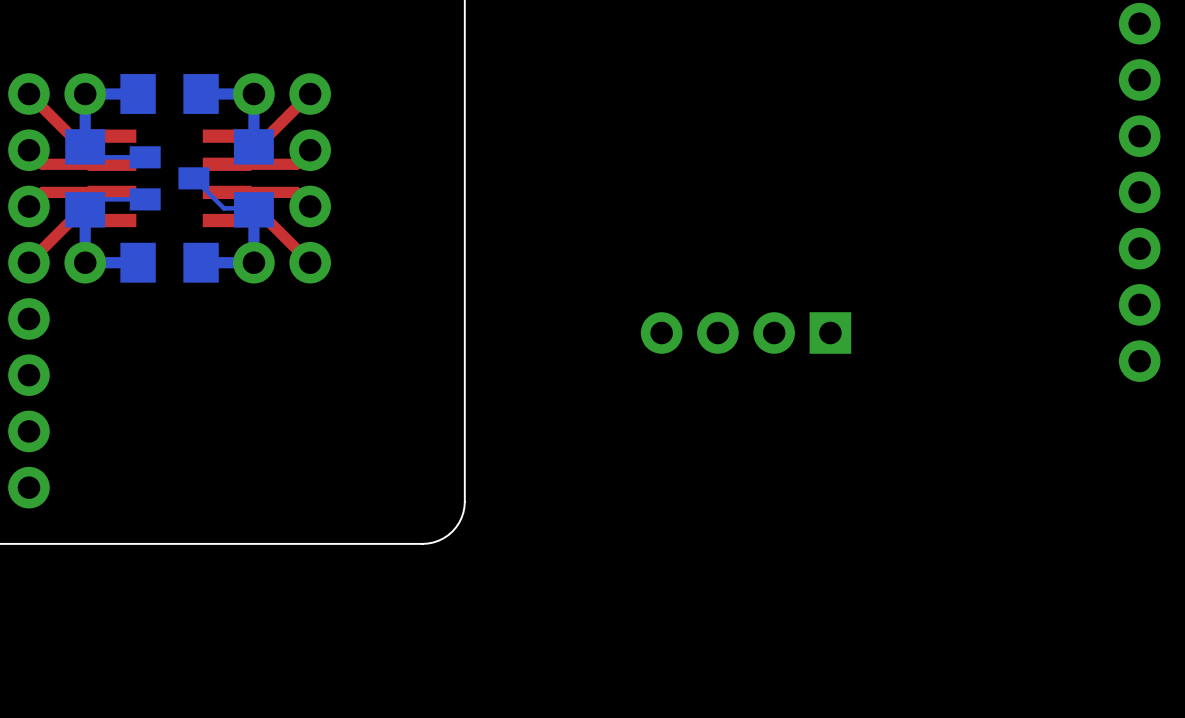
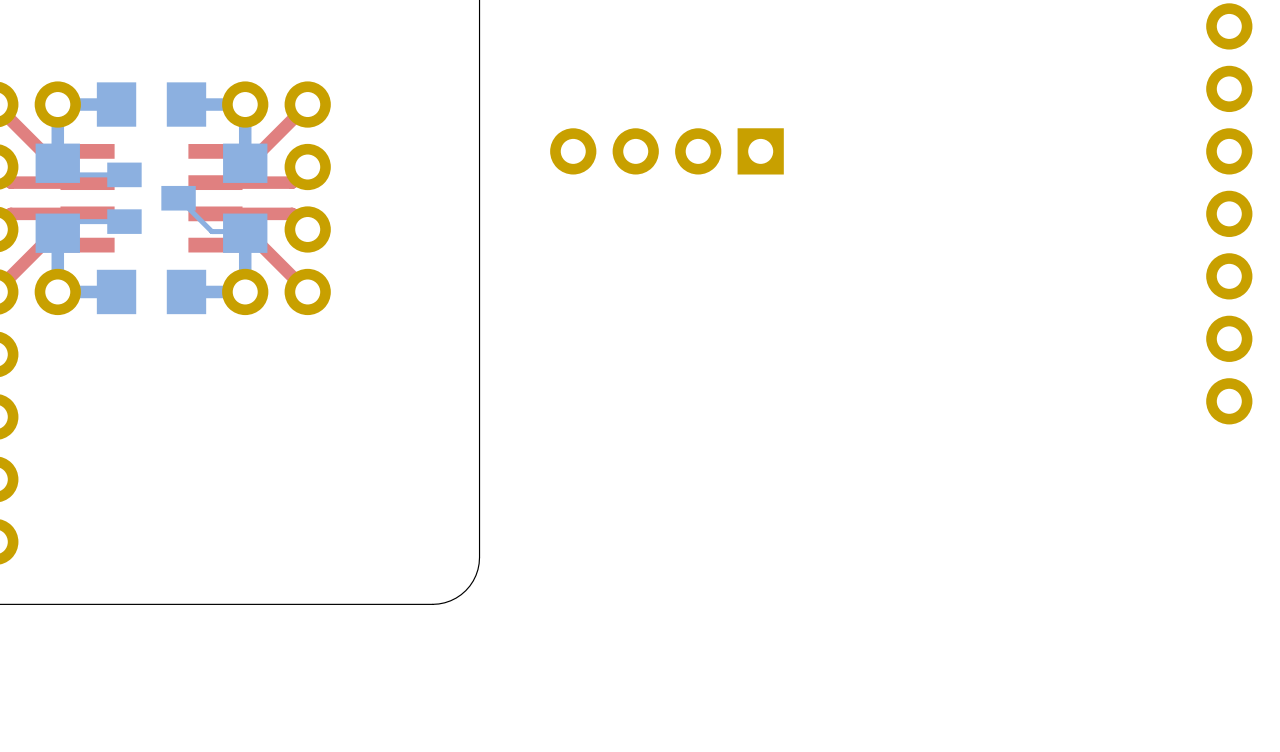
part position: (746, 333) -> (666, 151)

